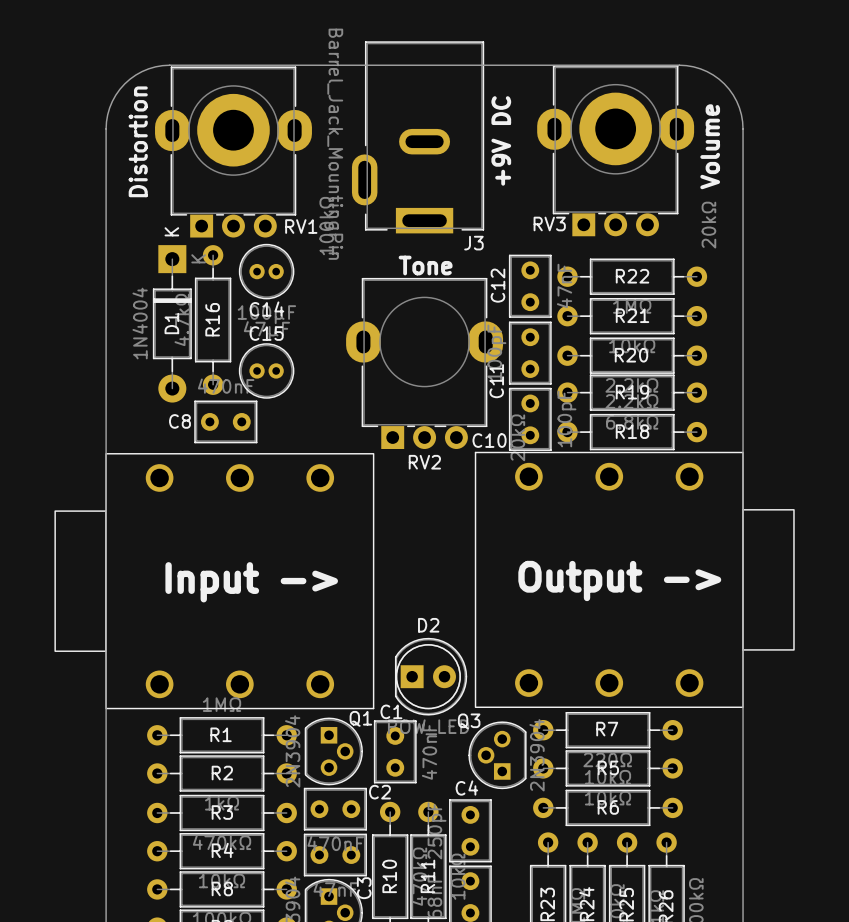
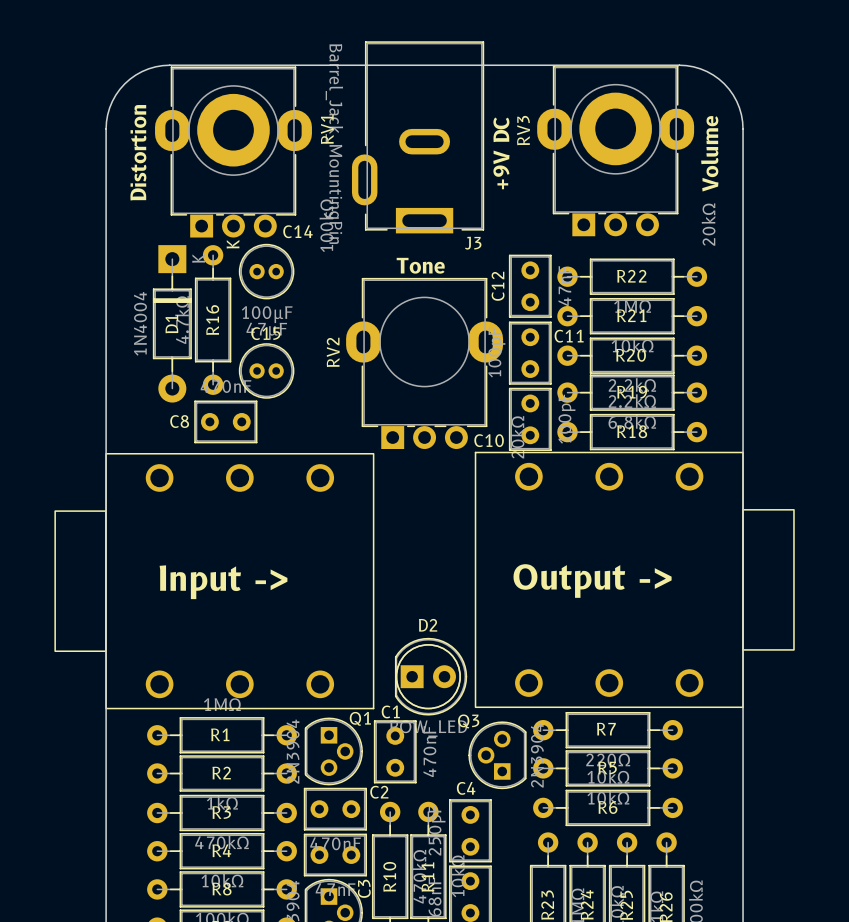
RV3 name rotation: 0° (549, 224) -> 90° counterclockwise (523, 130)
RV3 name position: RV3 (549, 224) -> RV3 (523, 130)
RV1 name rotation: 0° (301, 226) -> 90° counterclockwise (327, 129)
RV1 name position: RV1 (301, 226) -> RV1 (327, 129)
D1 text position: K (171, 231) -> K (233, 244)
C14 name position: C14 (266, 309) -> C14 (297, 231)
C11 name rotation: 0° (496, 381) -> 90° clockwise (569, 336)
C11 name position: C11 (496, 381) -> C11 (569, 336)
RV2 name rotation: 0° (424, 462) -> 90° counterclockwise (333, 352)
RV2 name position: RV2 (424, 462) -> RV2 (333, 352)

